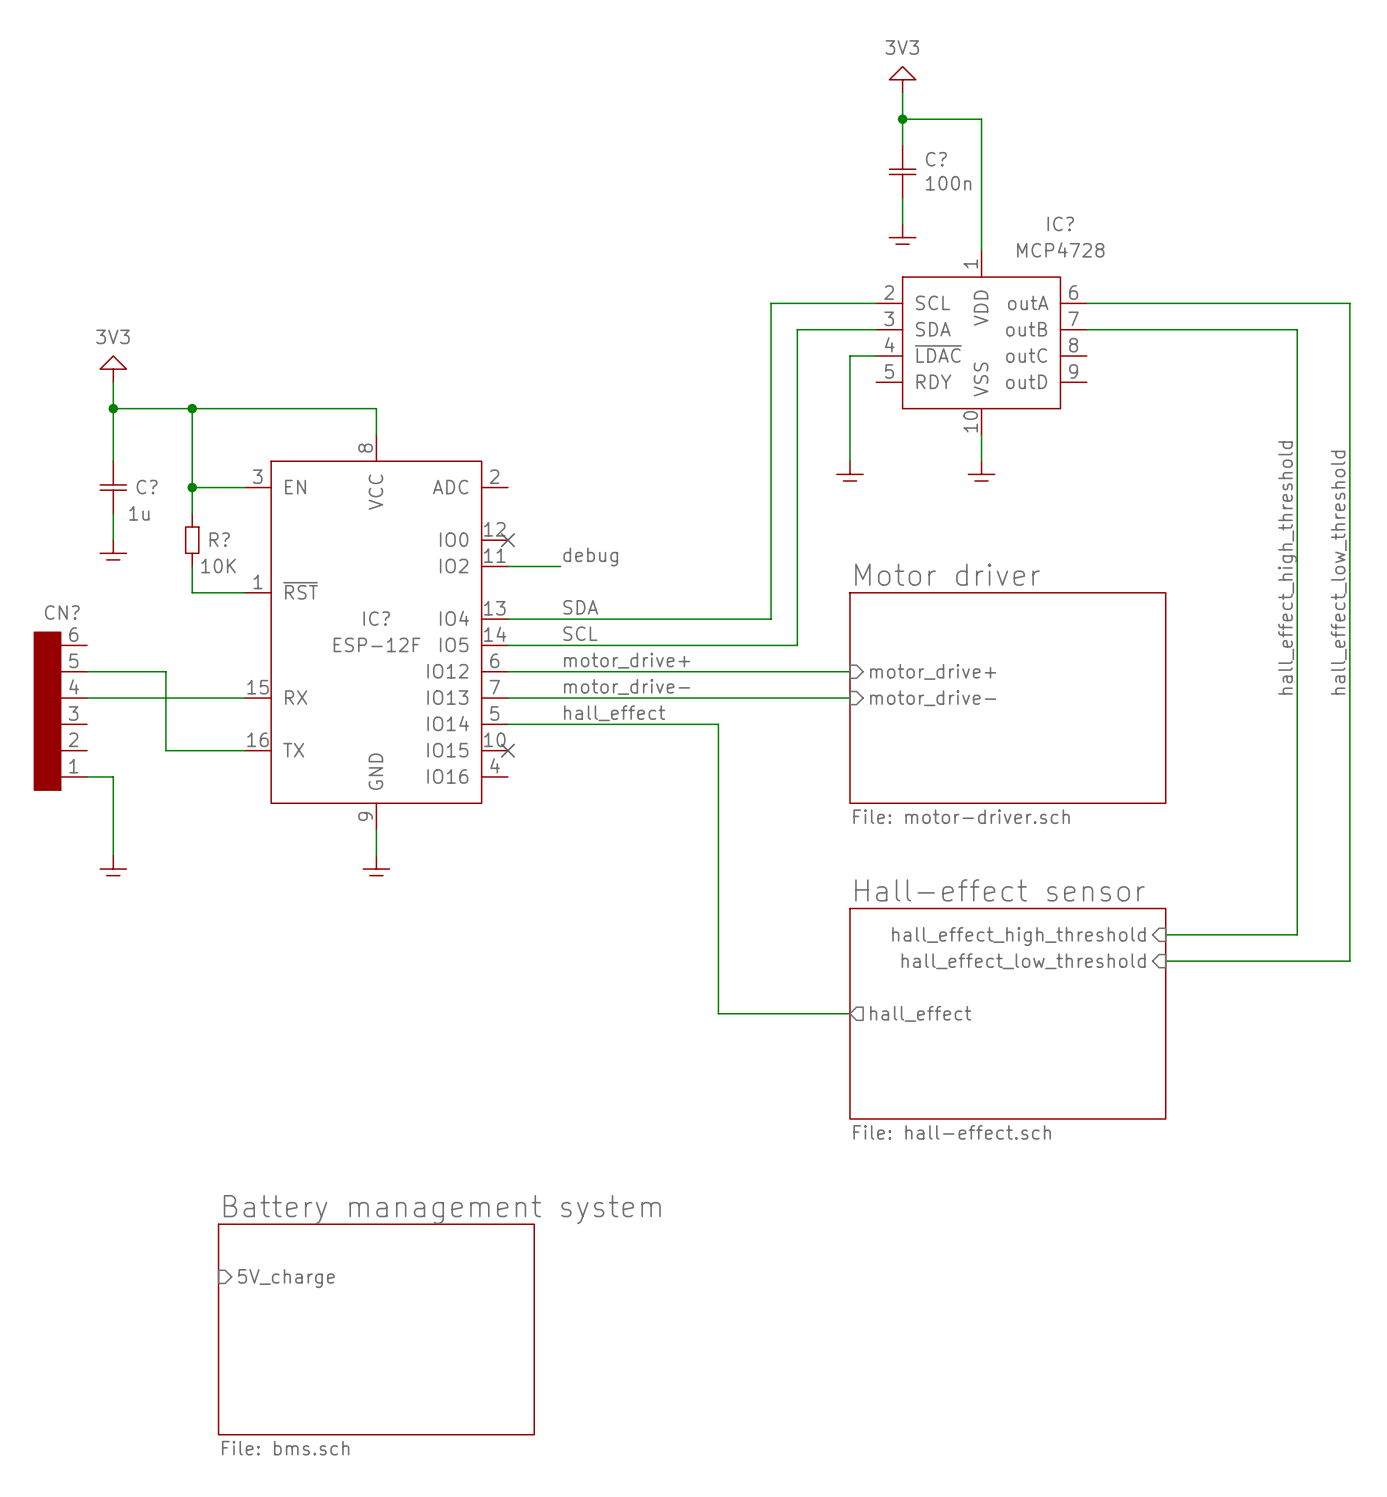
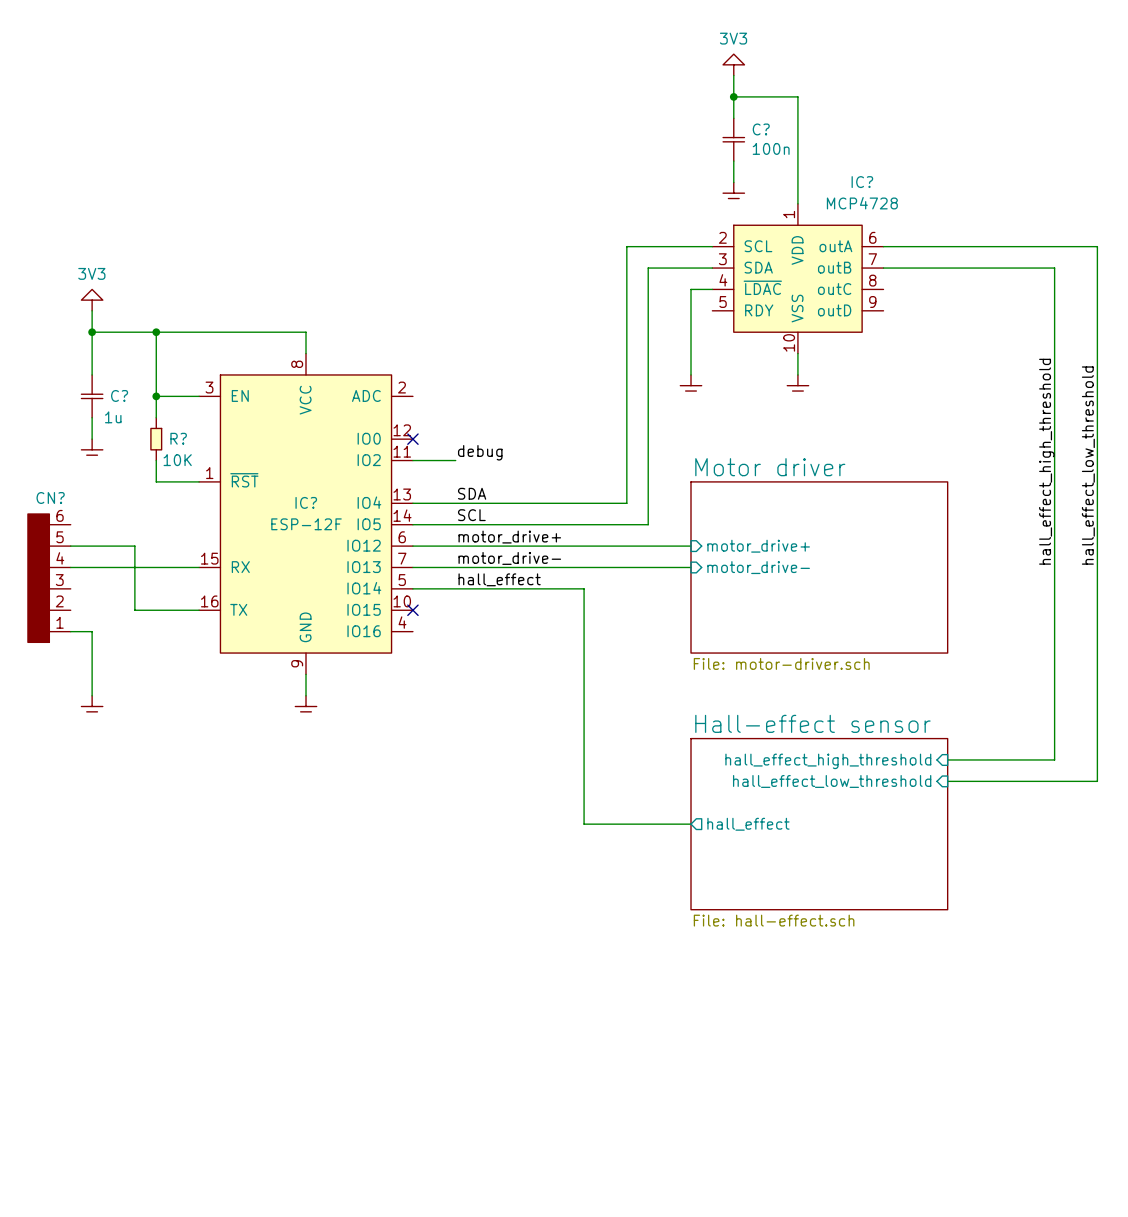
sheet pin: 5V_charge (286, 1278) -> none
sheet Battery management system: File: bms.sch (376, 1329) -> none

